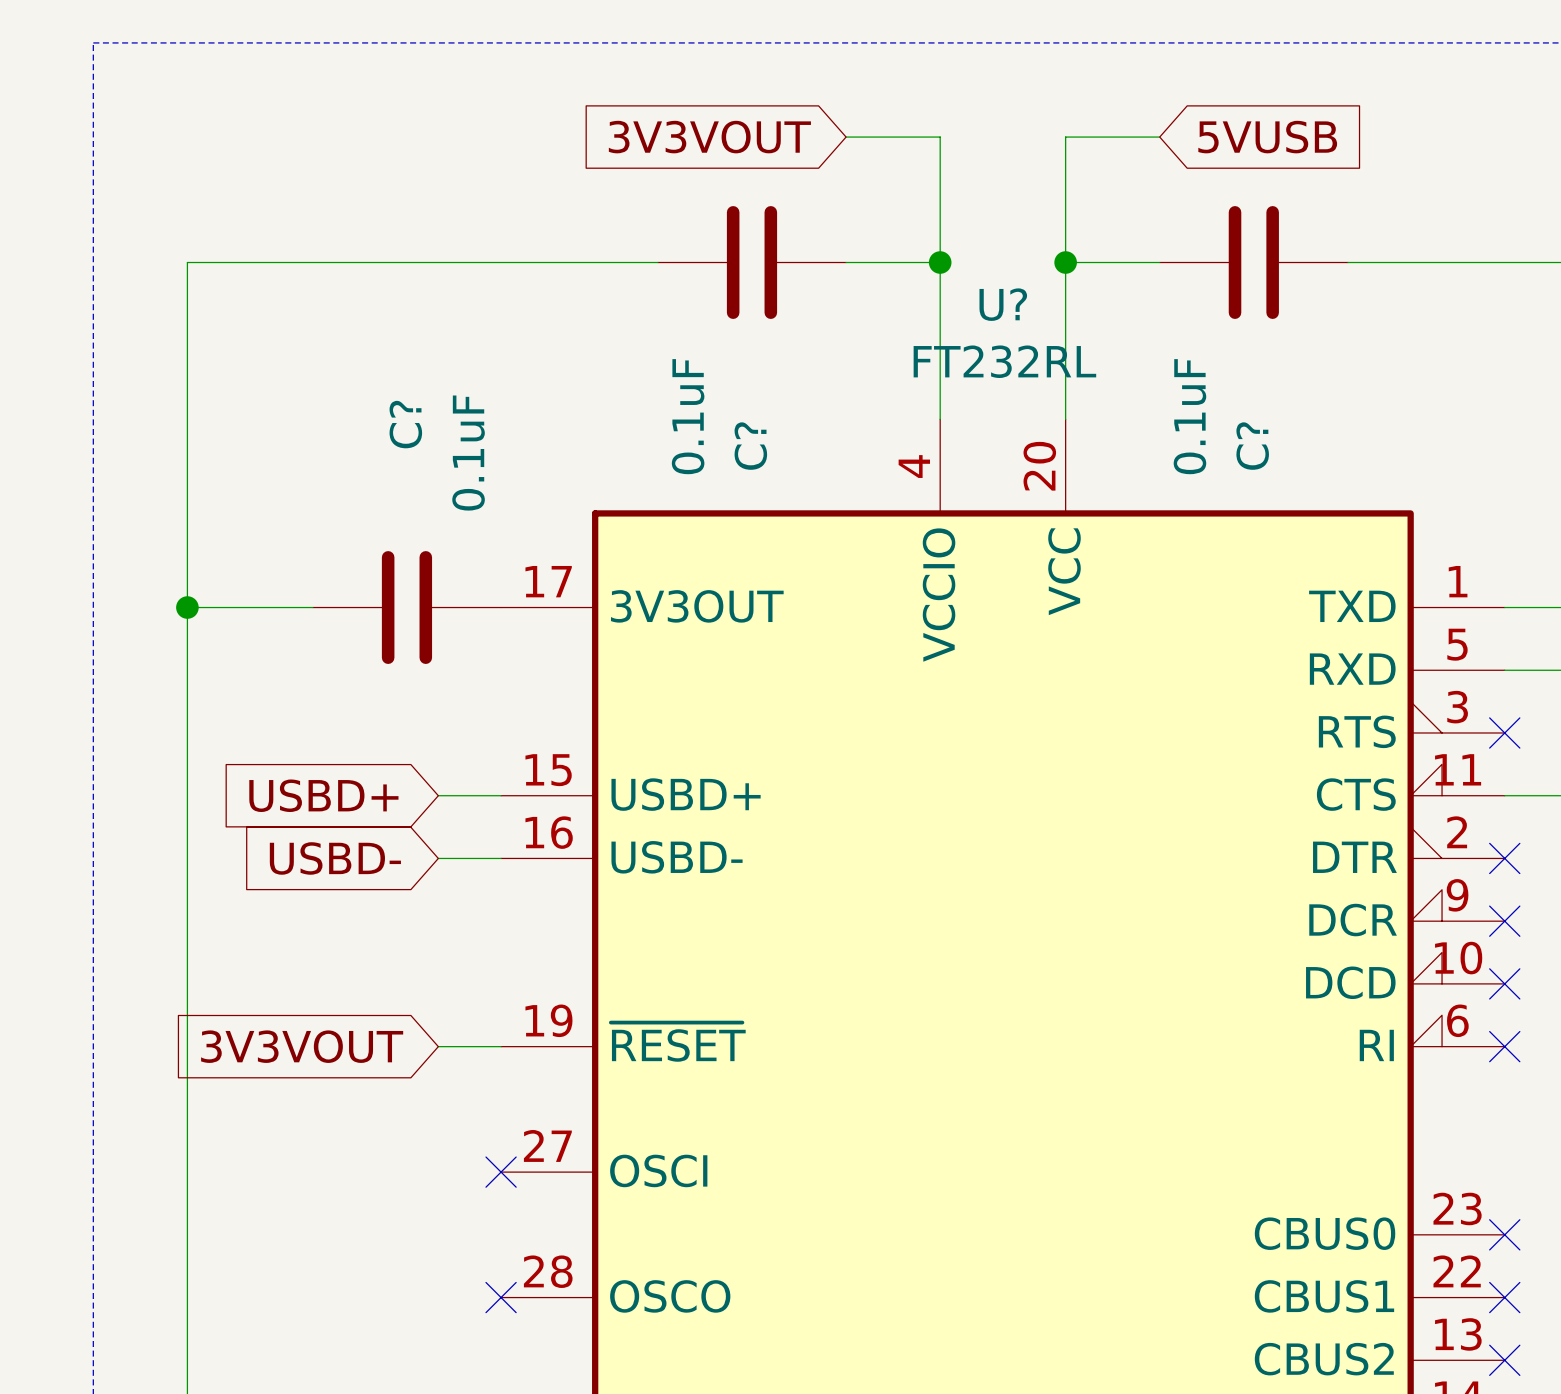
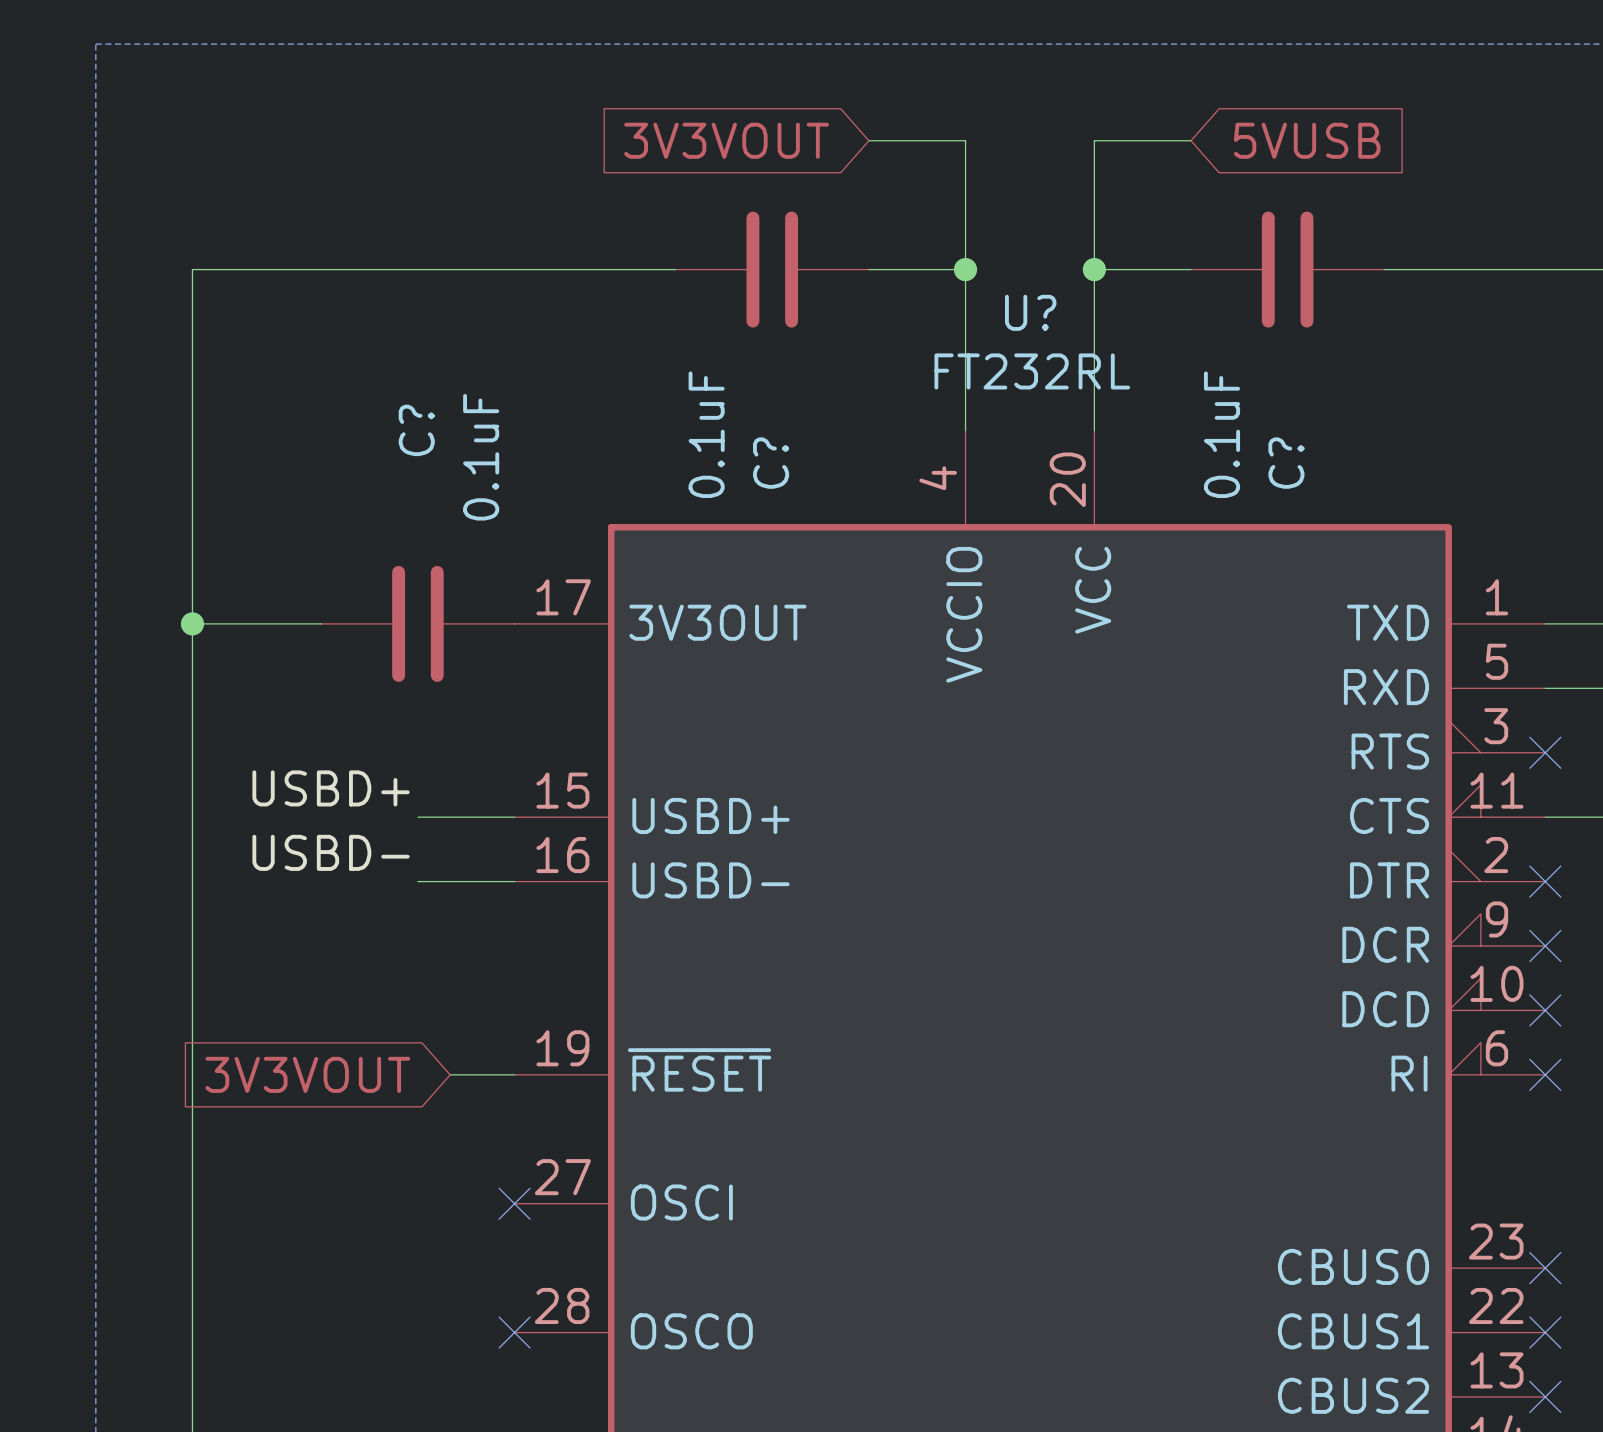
label: none -> USBD+ (331, 788)
global label: USBD+ (323, 795) -> none
wire: none -> (417, 817) (450, 817)
label: none -> USBD- (331, 852)
global label: USBD- (335, 858) -> none
wire: none -> (417, 881) (450, 881)

